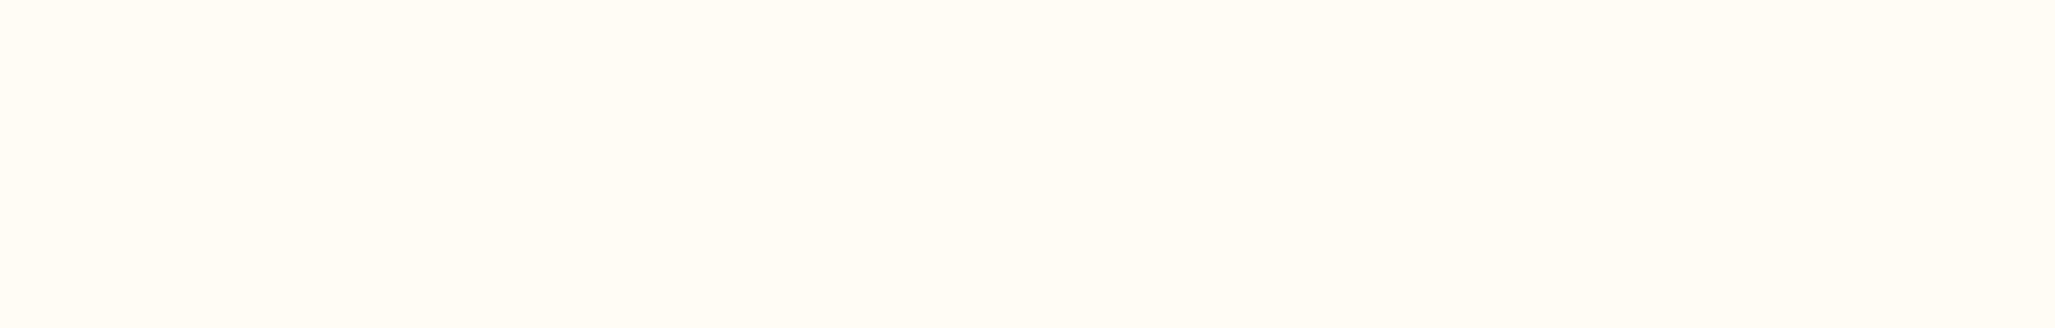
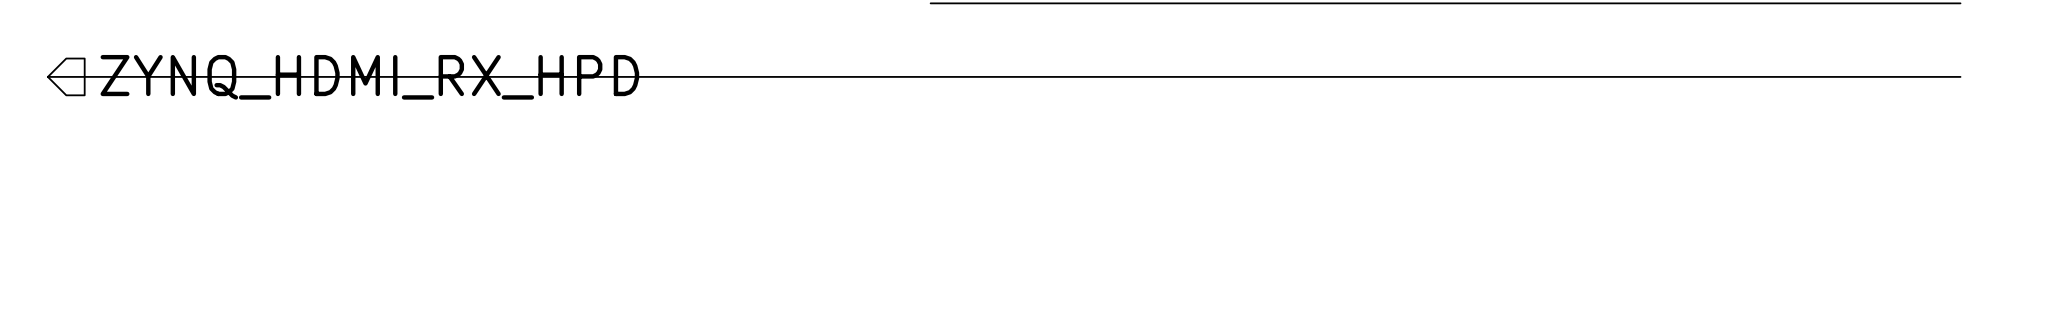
wire: none -> (930, 3) (1960, 3)
wire: none -> (47, 76) (1960, 76)
hierarchical label: none -> ZYNQ_HDMI_RX_HPD (369, 77)

